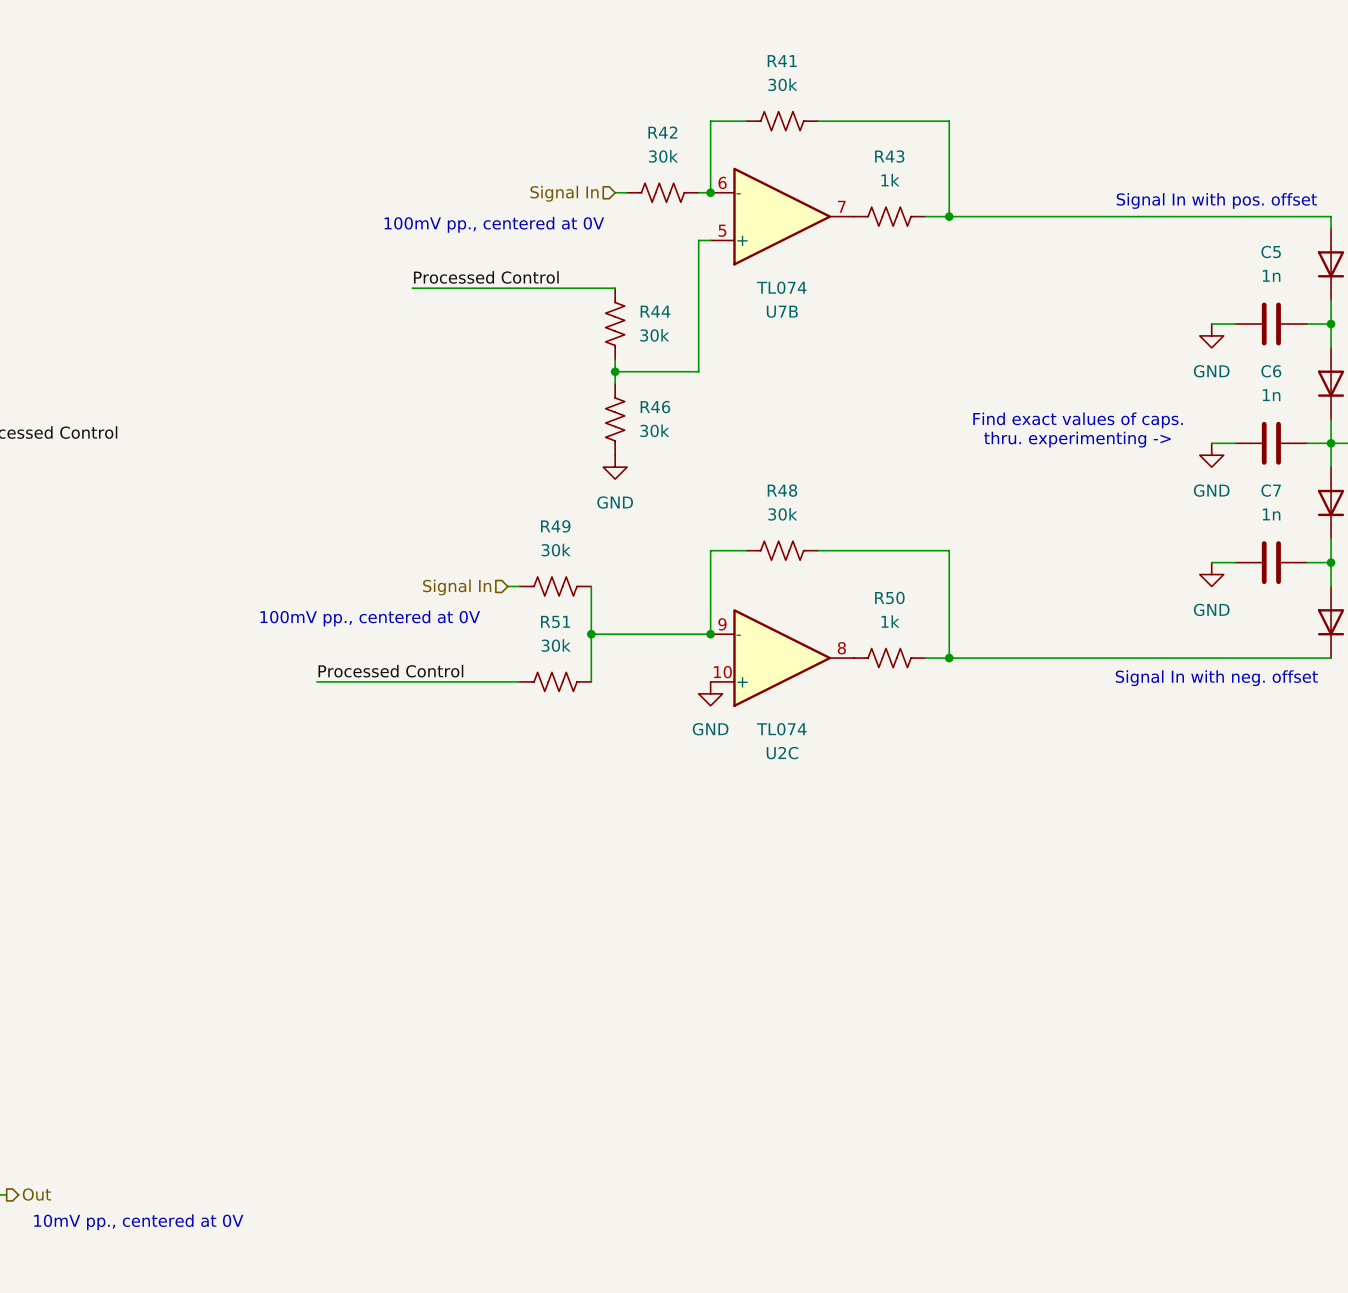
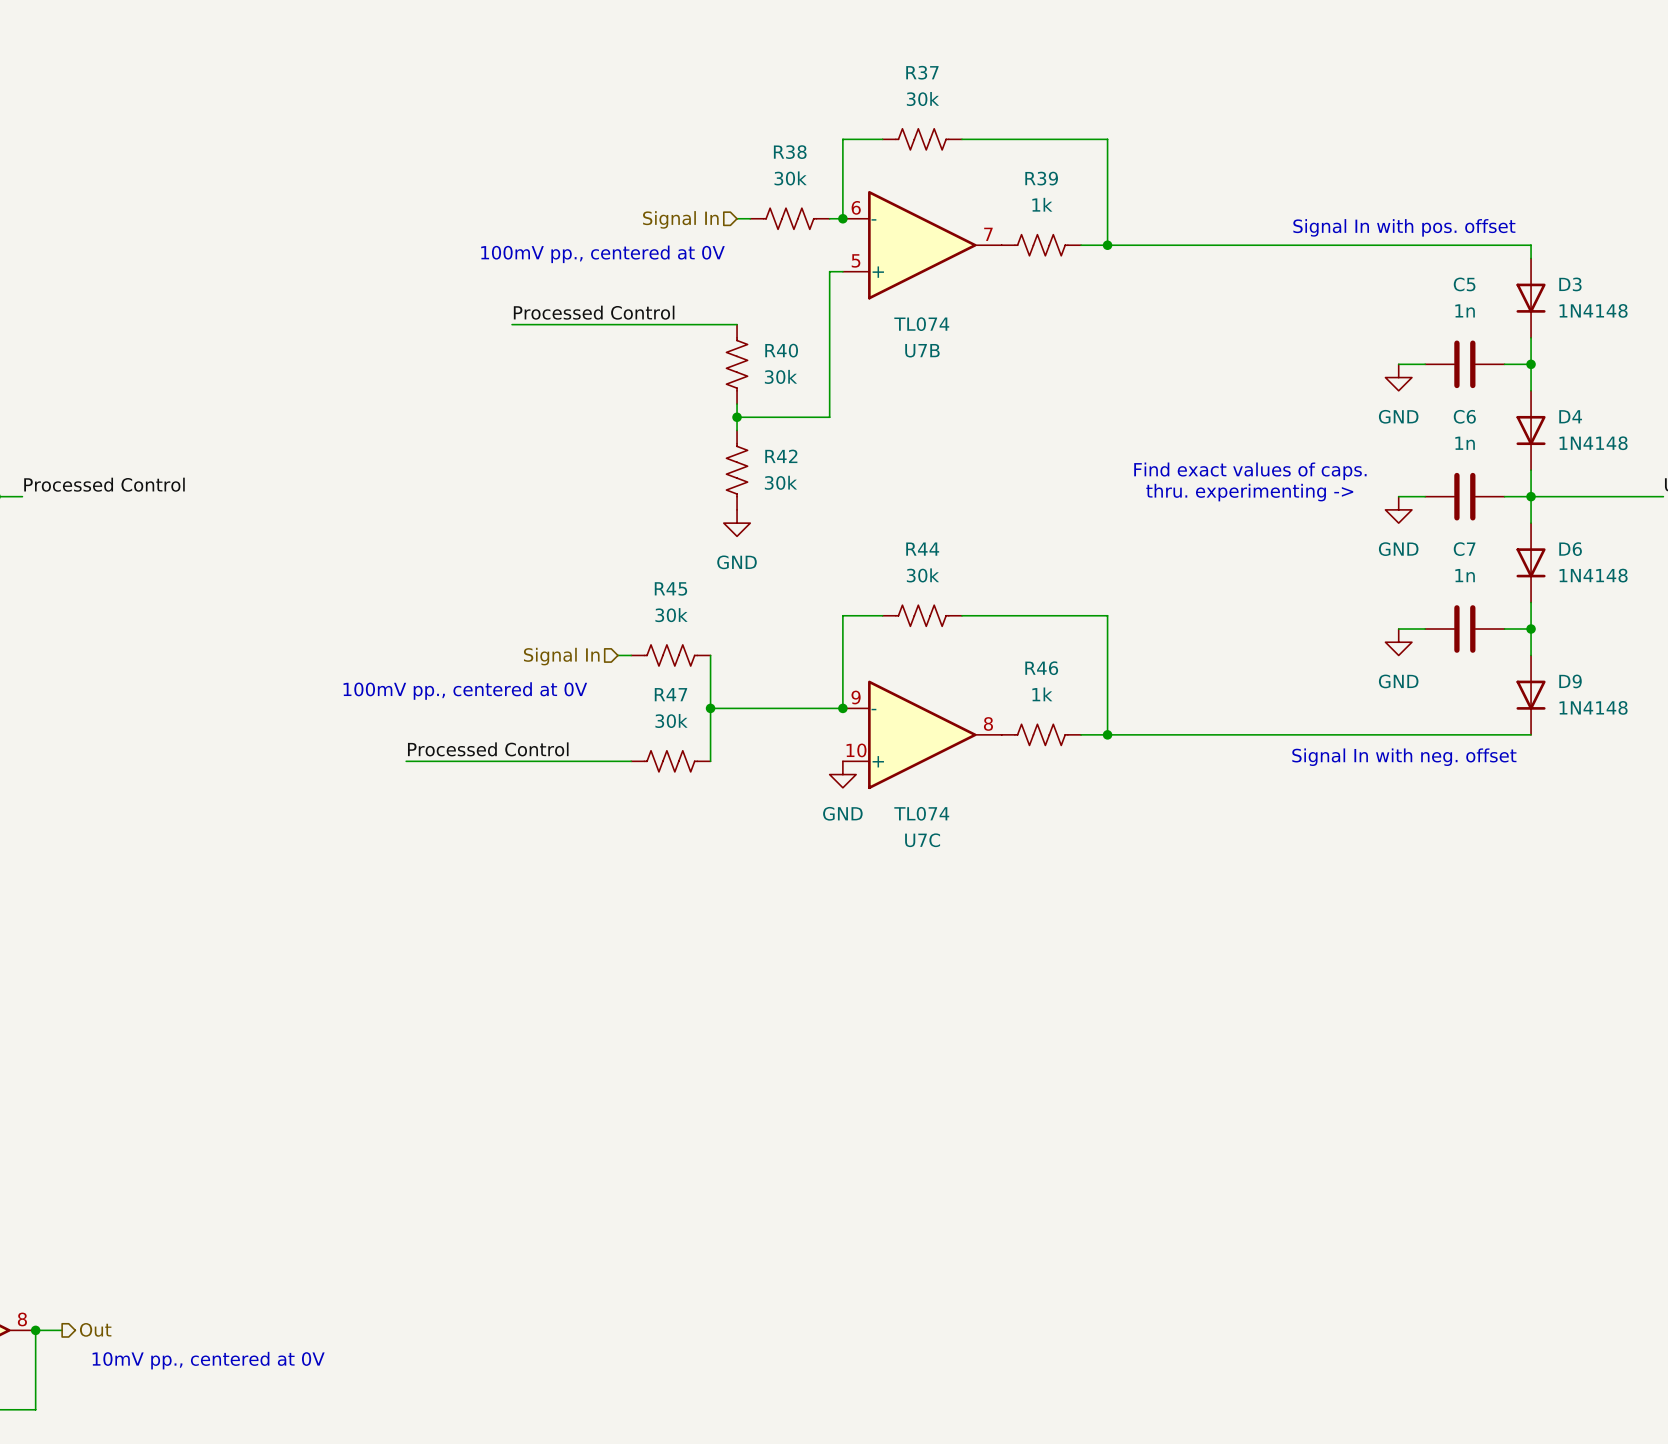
R41 name: R41 (782, 61) -> R37 (922, 72)
R42 name: R42 (662, 132) -> R38 (790, 152)
R43 name: R43 (889, 156) -> R39 (1041, 178)
R44 name: R44 (655, 311) -> R40 (781, 350)
R46 name: R46 (655, 407) -> R42 (781, 456)
R48 name: R48 (782, 490) -> R44 (922, 549)
R49 name: R49 (555, 526) -> R45 (670, 588)
R50 name: R50 (889, 597) -> R46 (1041, 668)
R51 name: R51 (555, 621) -> R47 (670, 694)
U2C name: U2C (782, 753) -> U7C (922, 840)

